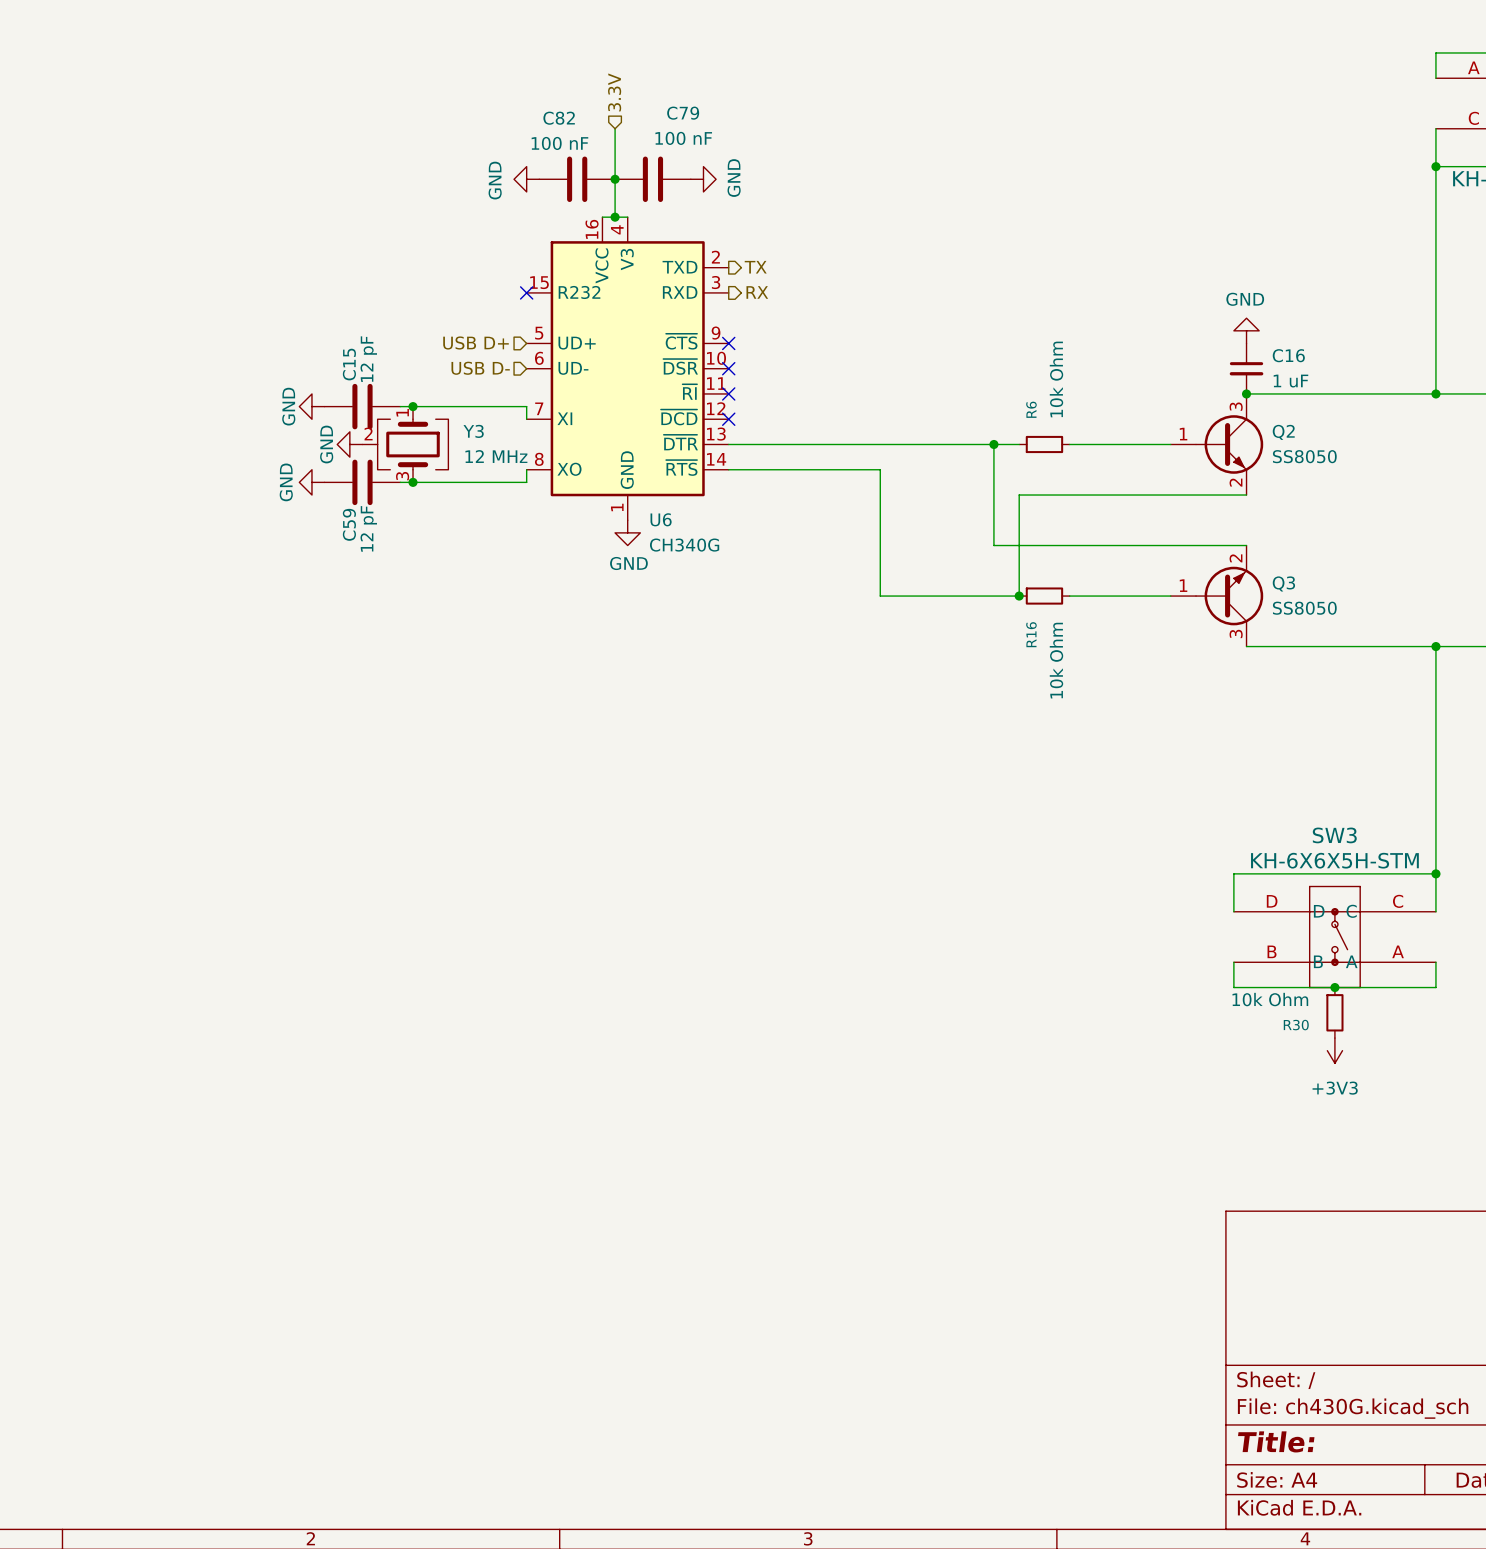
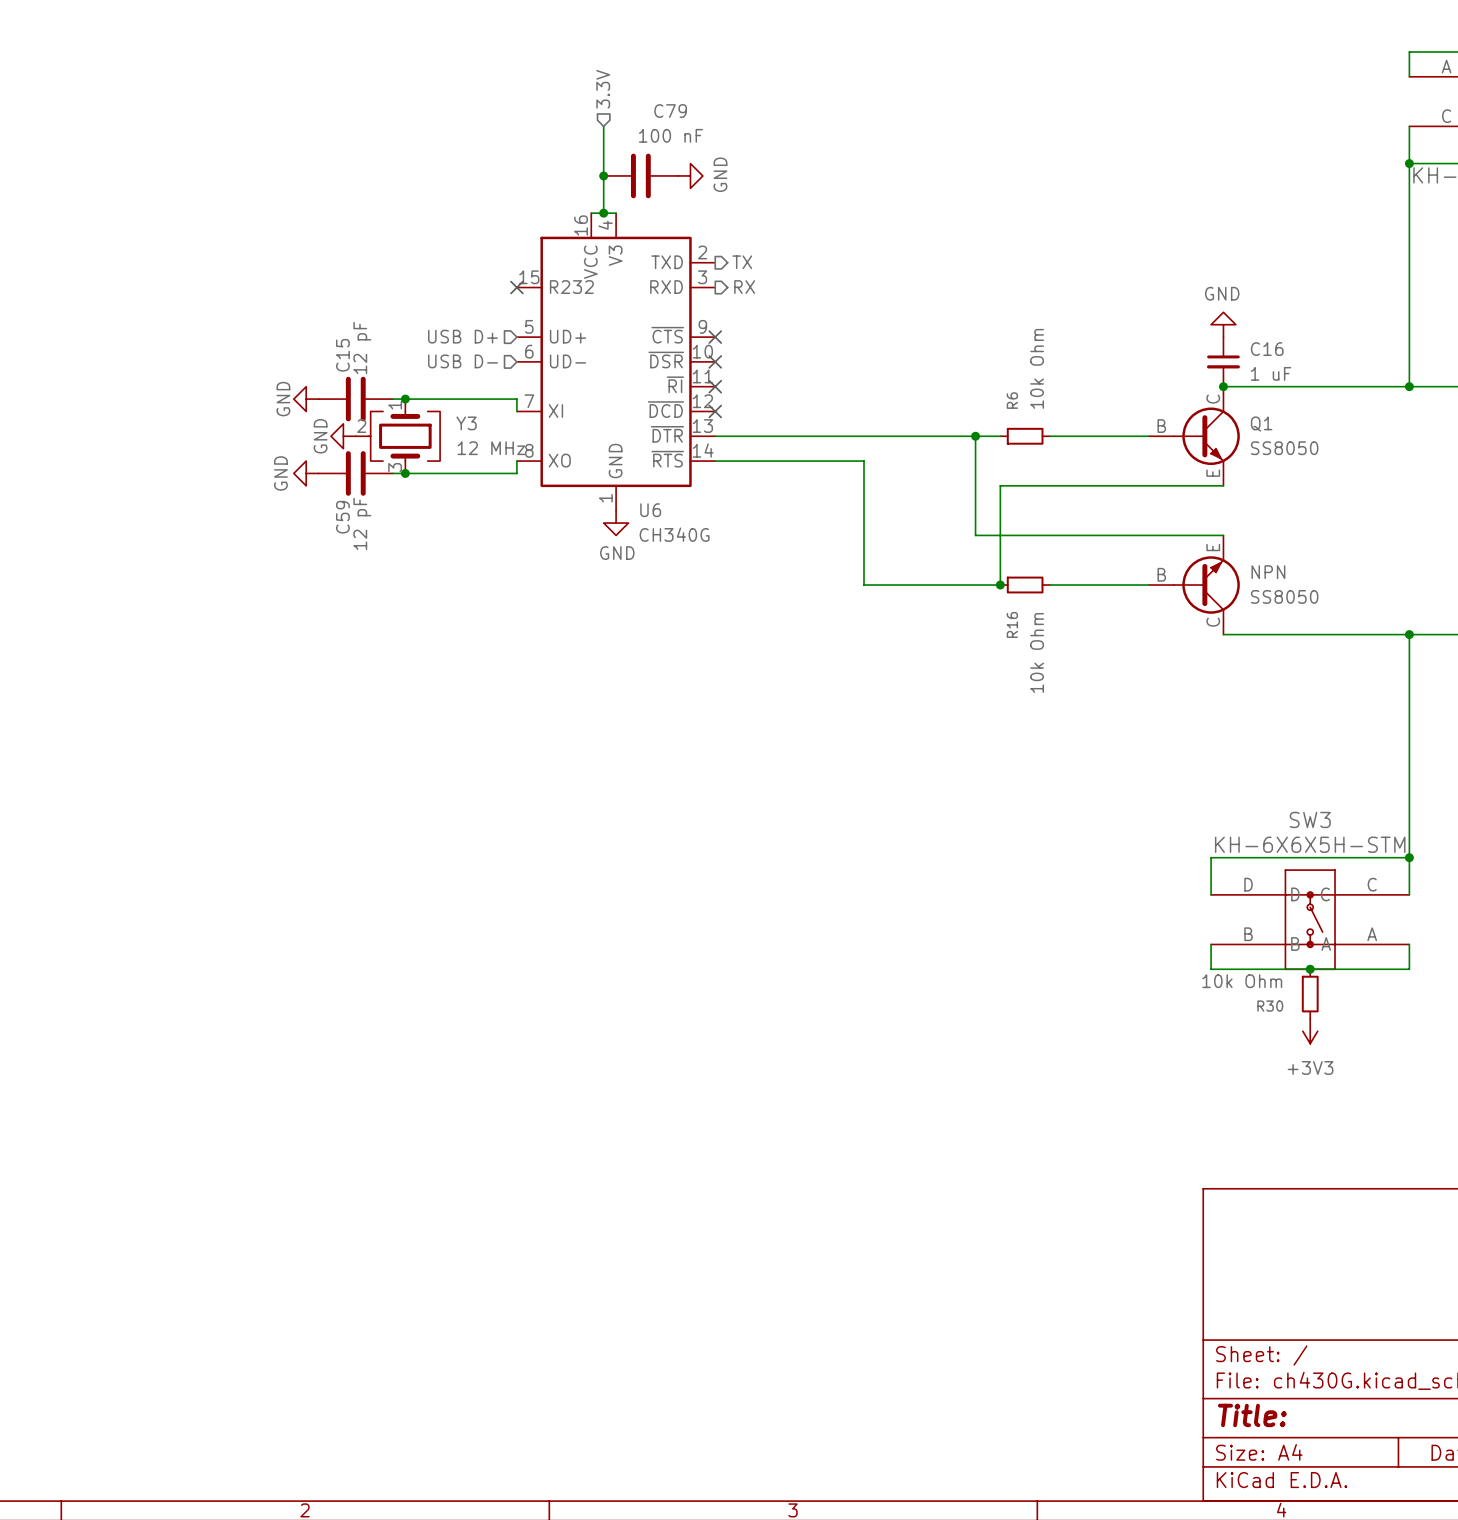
power symbol: GND (526, 179) -> none
C82: 100 nF (577, 179) -> none
Q2: SS8050 (1216, 444) -> none
Q1: none -> SS8050 (1194, 436)
Q3: SS8050 (1216, 596) -> none
SS8050: none -> NPN (1194, 585)

